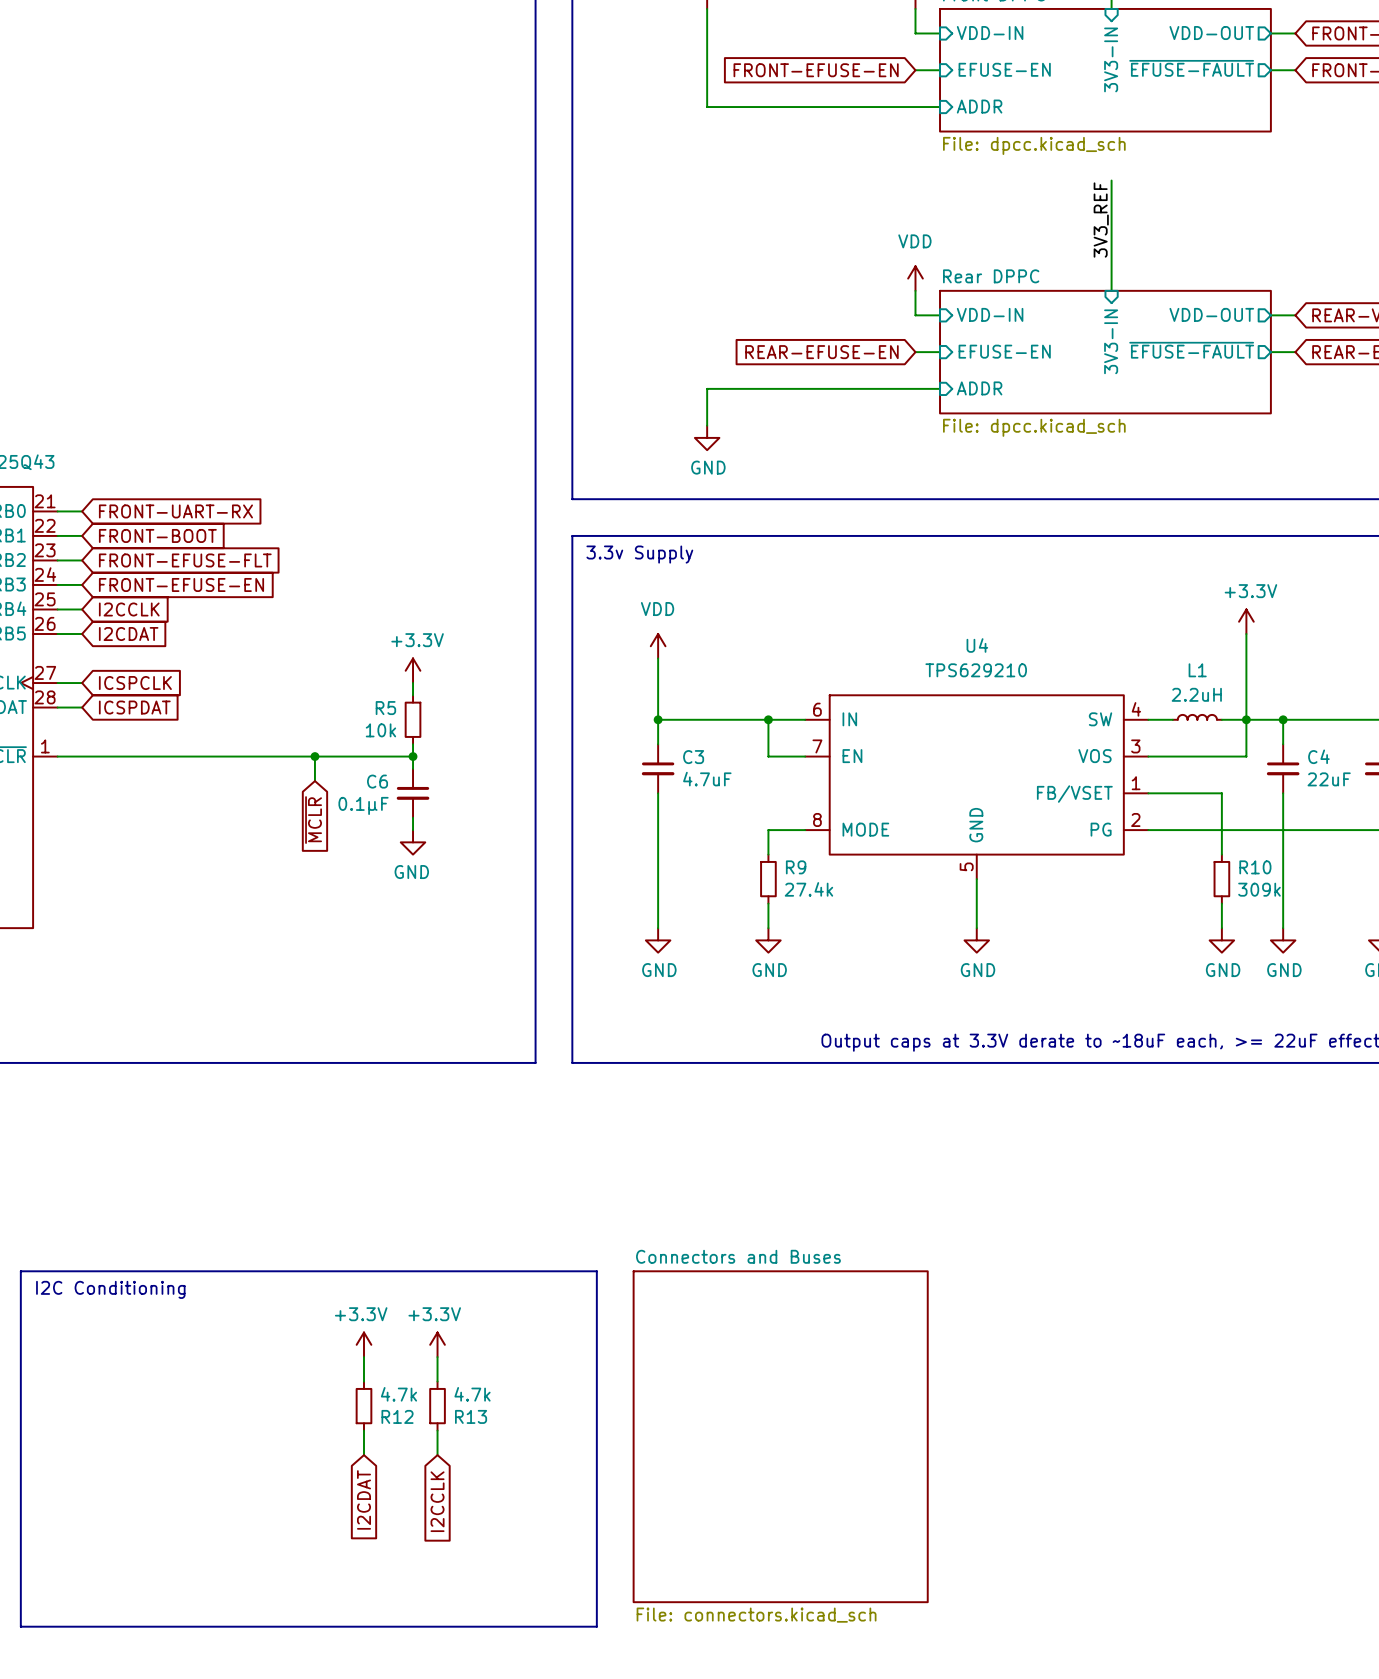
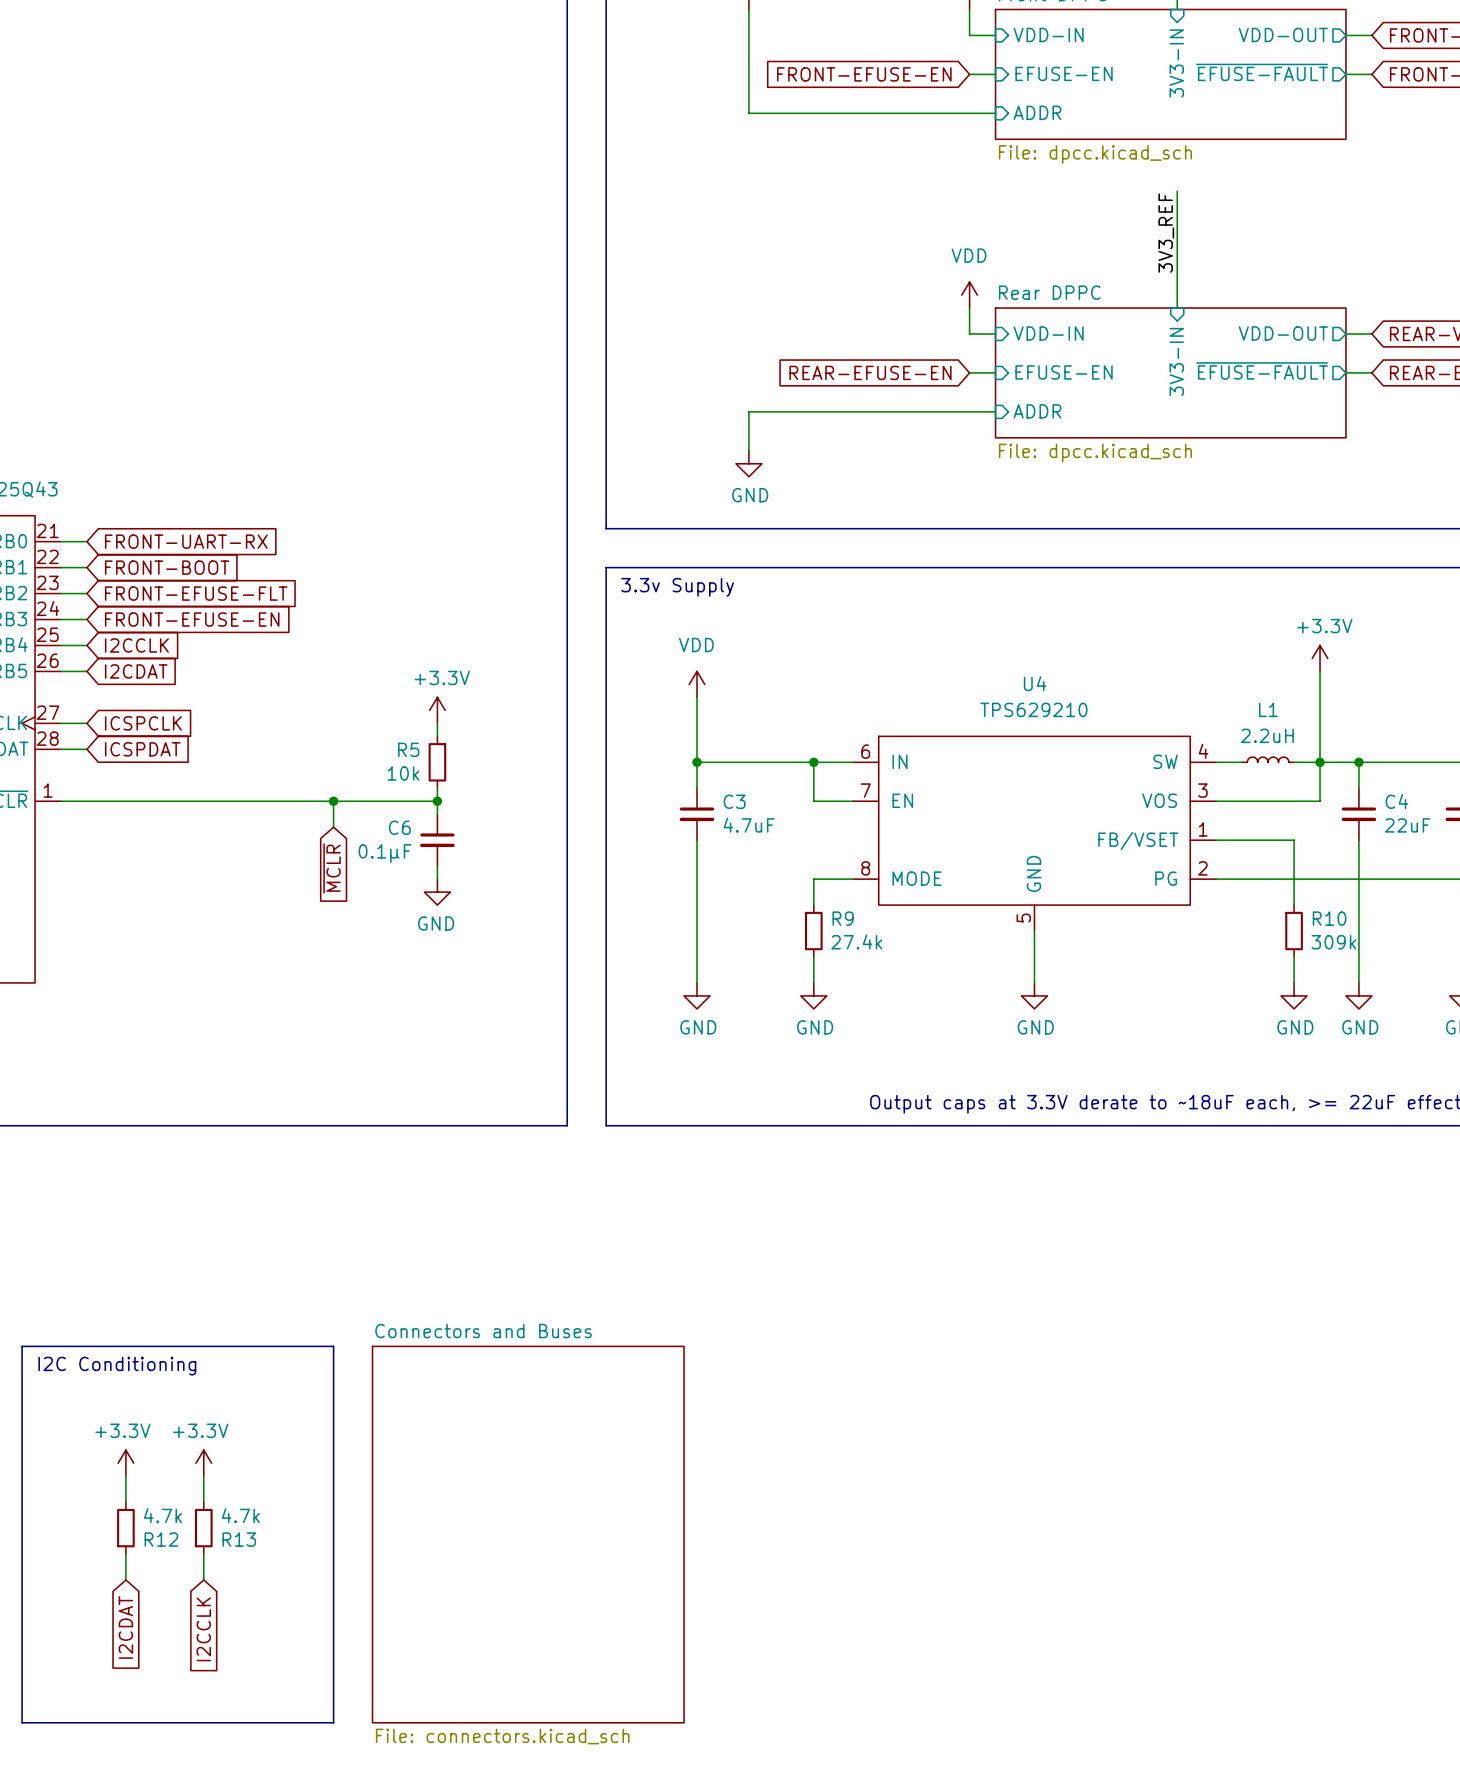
line: (314, 1271) (596, 1271) (596, 1626) (314, 1626) -> (333, 1346) (333, 1722)
power symbol: +3.3V (363, 1344) -> none
power symbol: +3.3V (437, 1344) -> none
wire: (363, 1357) (363, 1381) -> (203, 1476) (203, 1502)
wire: (437, 1357) (437, 1381) -> none
power symbol: none -> +3.3V (125, 1463)
power symbol: none -> +3.3V (203, 1463)
wire: none -> (125, 1476) (125, 1502)
R12 position: (363, 1406) -> (125, 1528)
R13 position: (437, 1406) -> (203, 1528)
wire: (363, 1430) (363, 1455) -> (203, 1554) (203, 1580)
wire: (437, 1430) (437, 1455) -> none
sheet Connectors and Buses: File: connectors.kicad_sch (780, 1436) -> none
sheet Connectors and Buses: none -> File: connectors.kicad_sch (528, 1534)
wire: none -> (125, 1554) (125, 1580)
global label: I2CDAT (363, 1499) -> none
global label: I2CCLK (437, 1501) -> none
global label: none -> I2CDAT (125, 1627)
global label: none -> I2CCLK (203, 1629)

